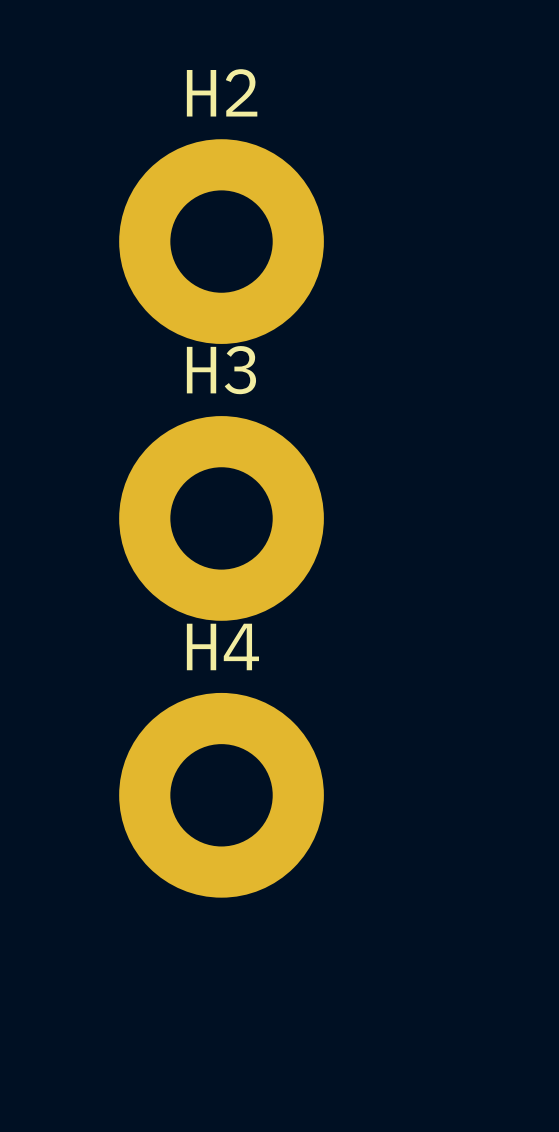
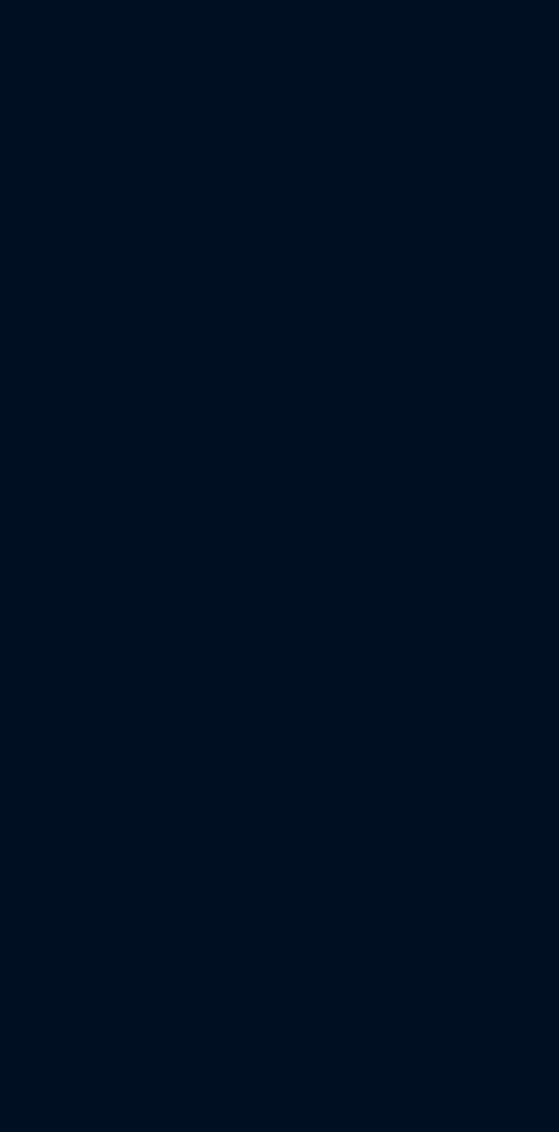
H2: (221, 241) -> none
H3: (221, 518) -> none
H4: (221, 795) -> none

